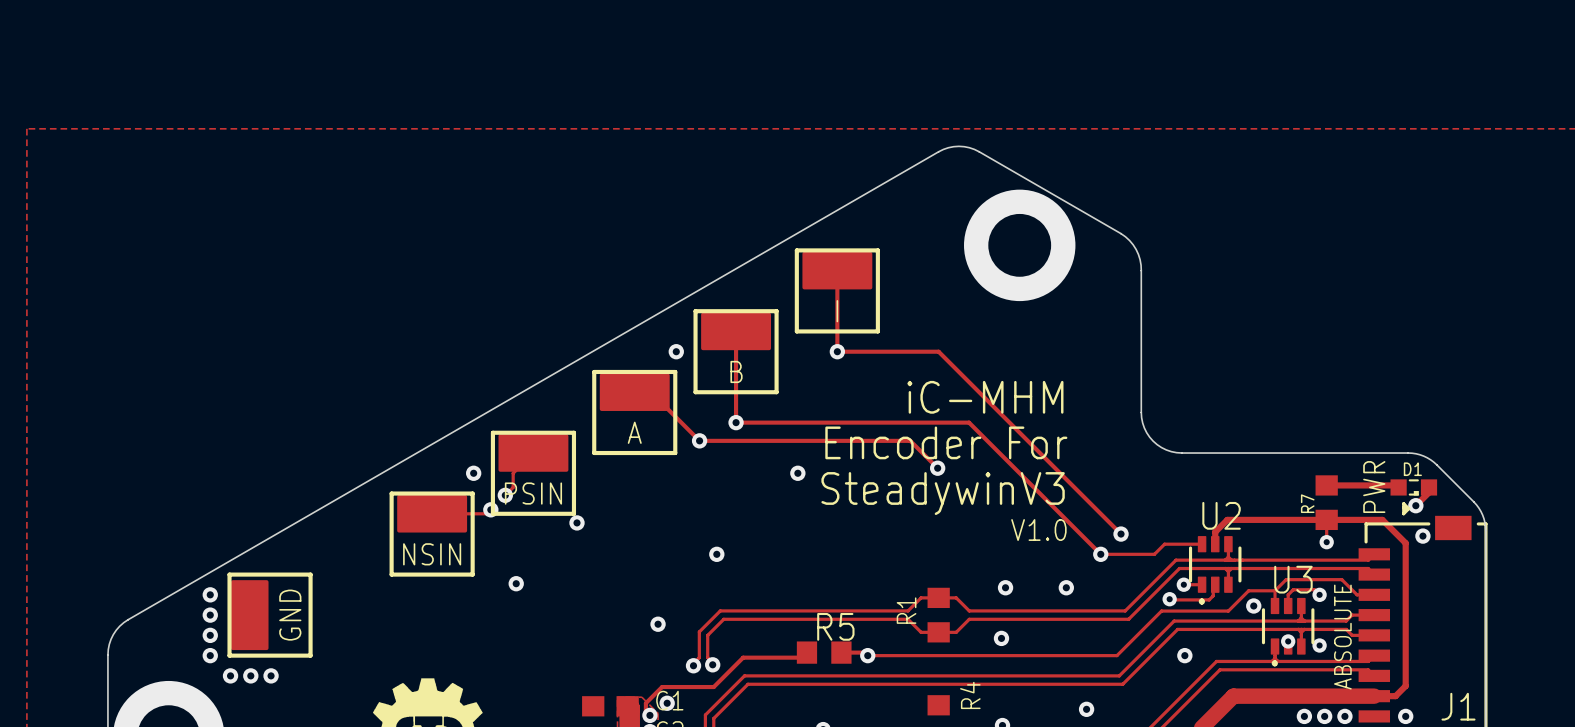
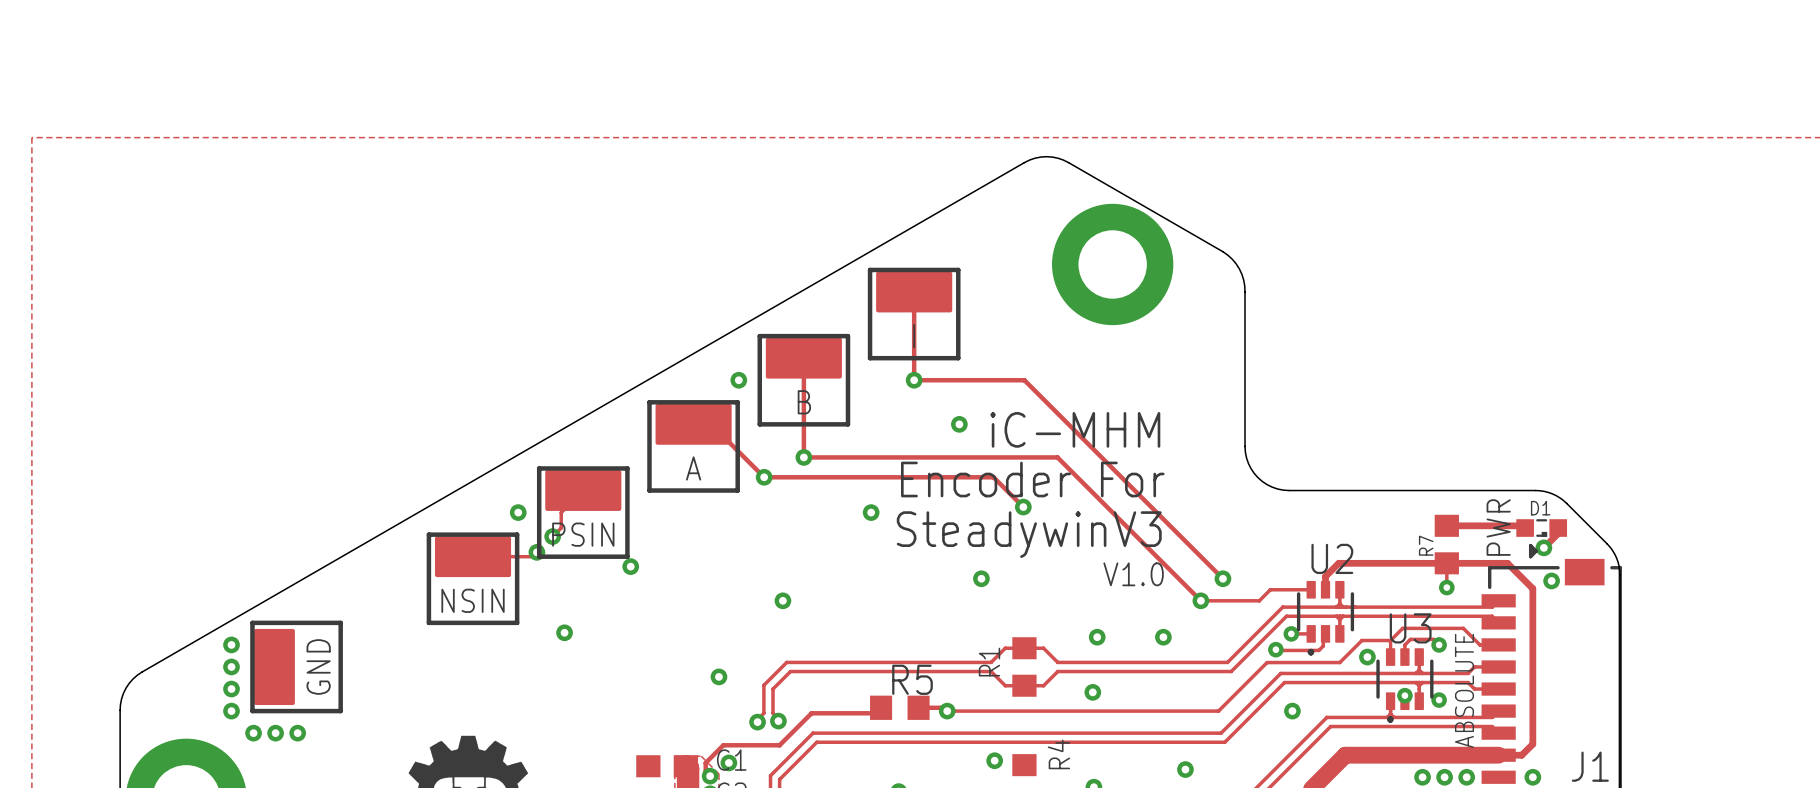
via: none -> (959, 424)
via: none -> (981, 578)
via: none -> (994, 760)

